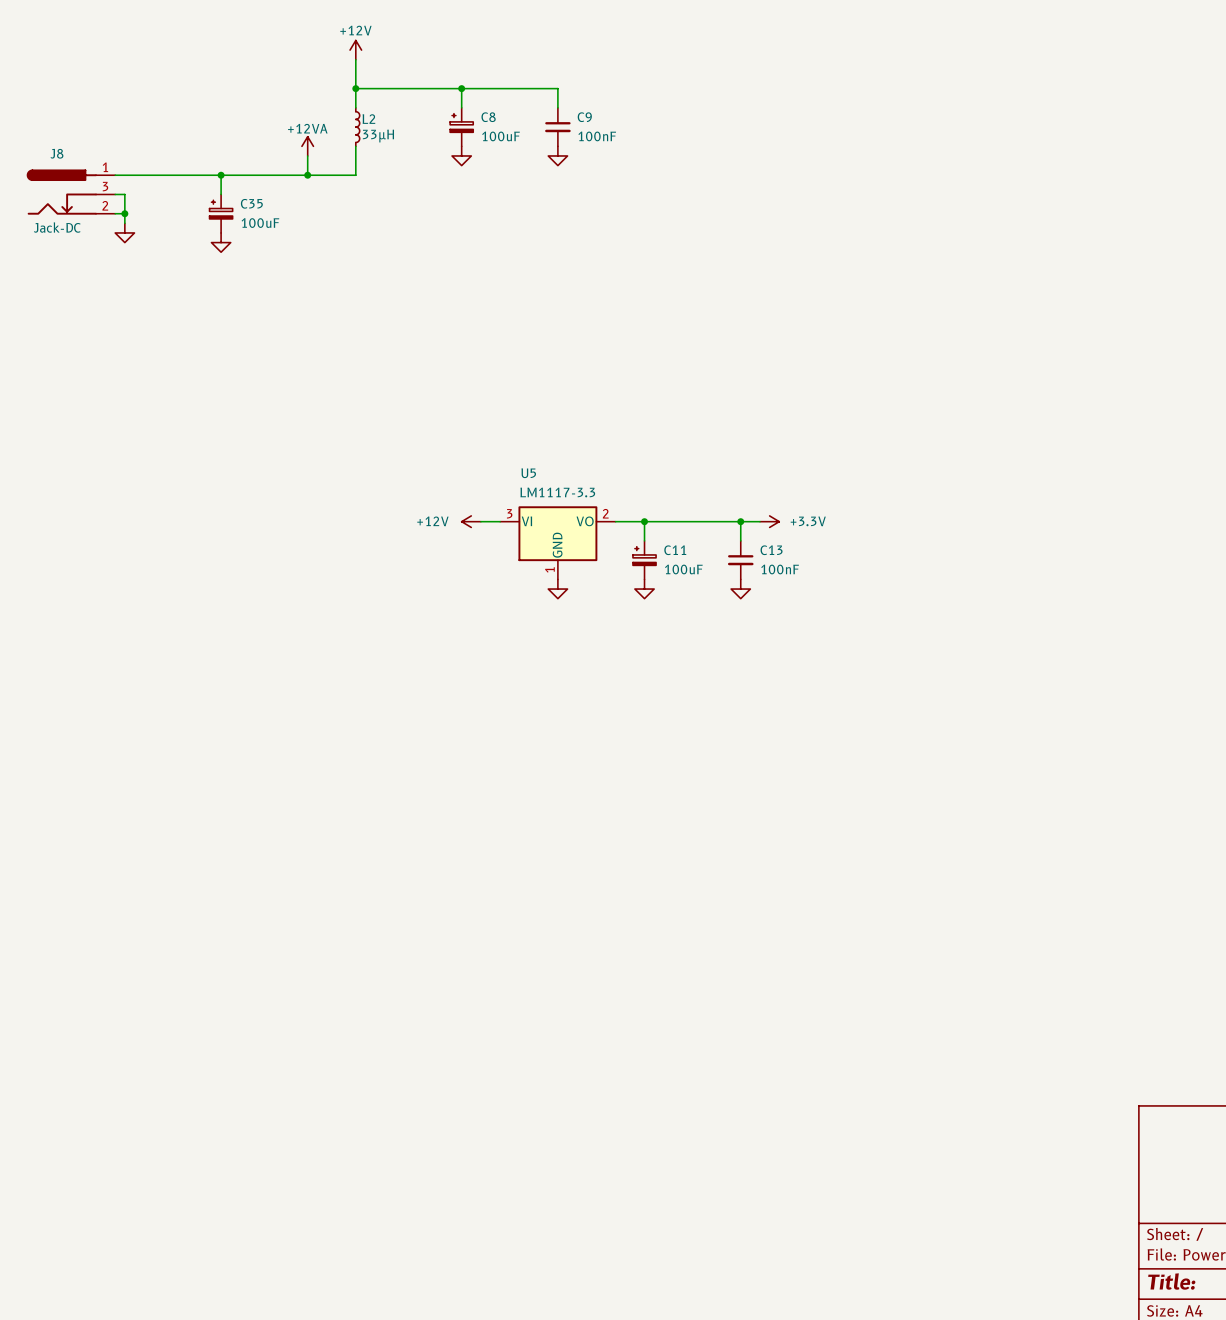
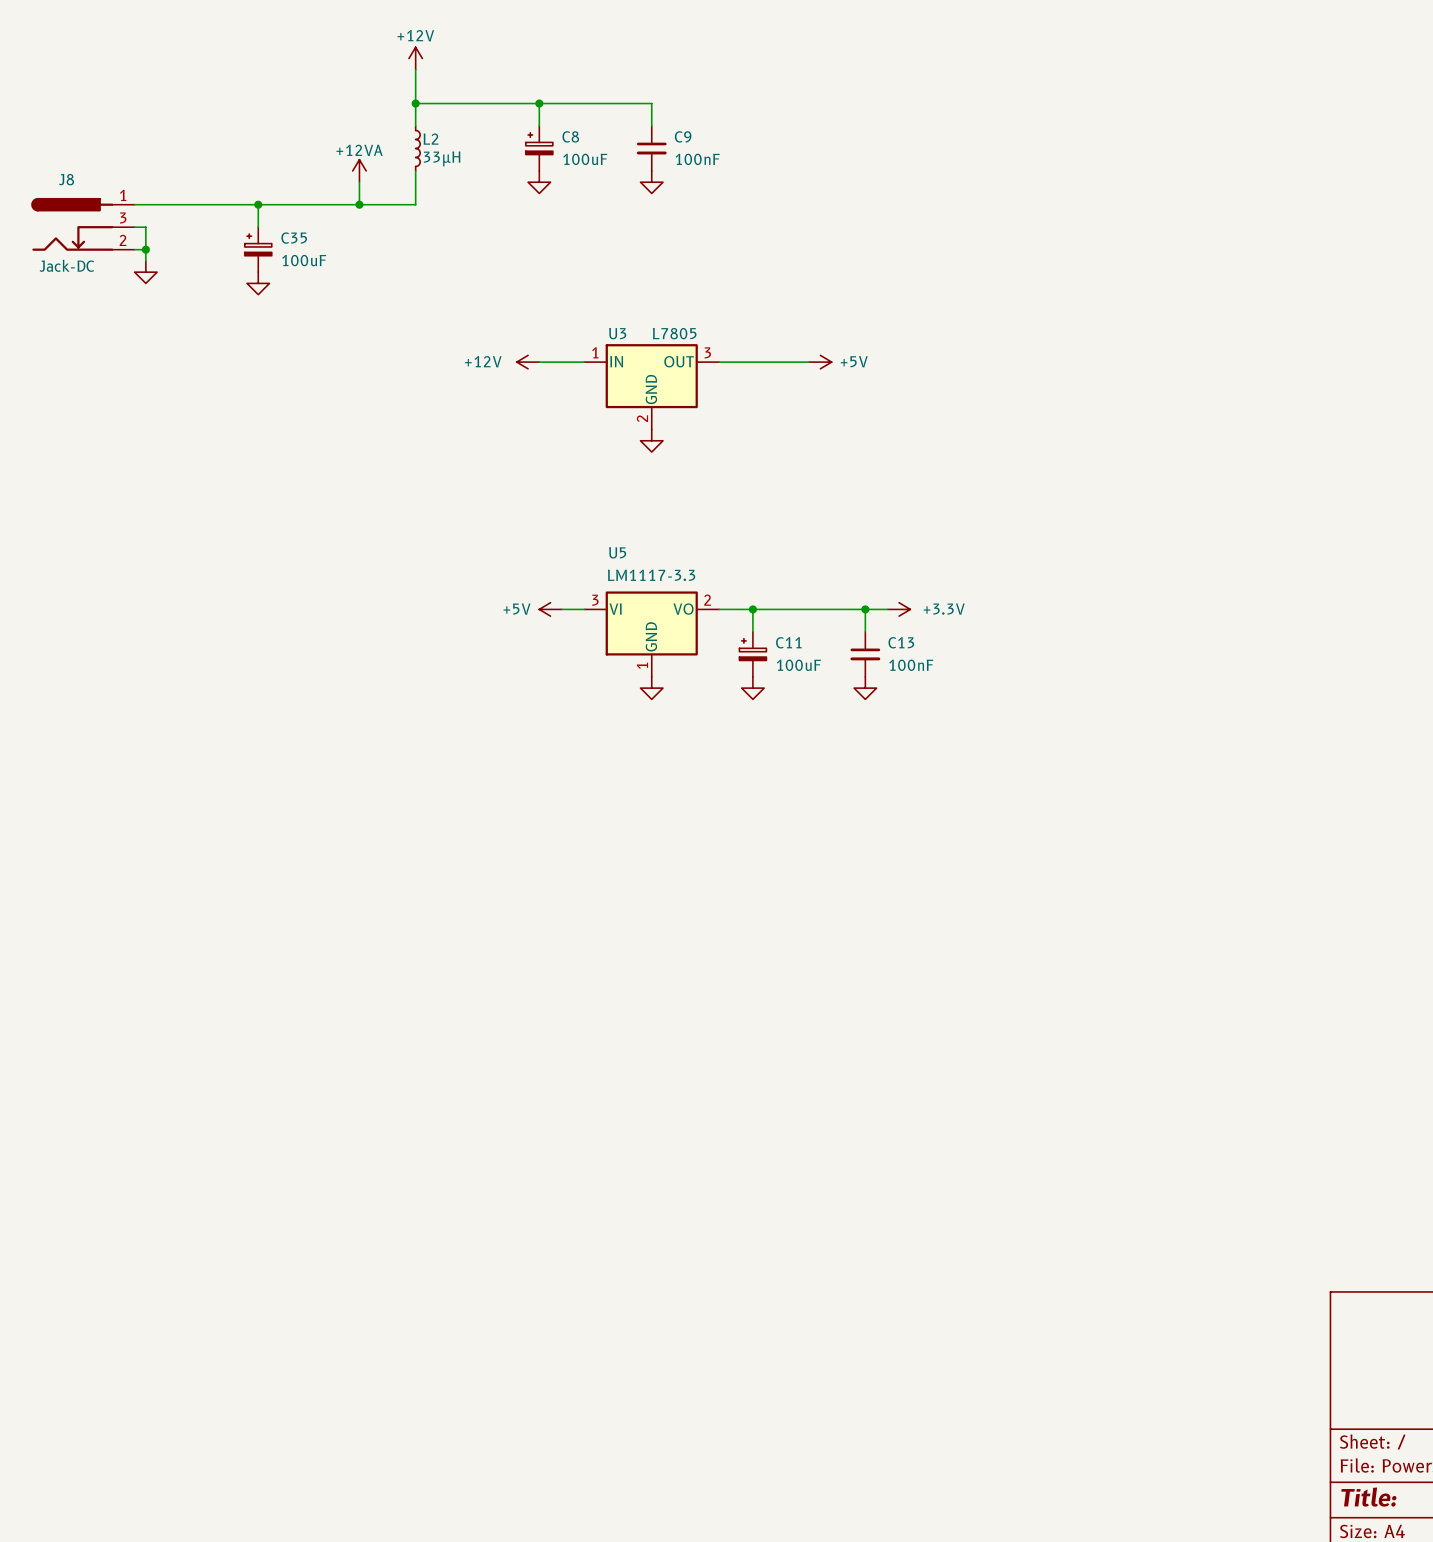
power symbol: none -> +12V (528, 362)
wire: none -> (539, 362) (584, 362)
wire: none -> (719, 362) (809, 362)
power symbol: none -> +5V (820, 362)
U3: none -> L7805 (651, 386)
power symbol: none -> (651, 440)
power symbol: +12V (471, 521) -> +5V (550, 609)

